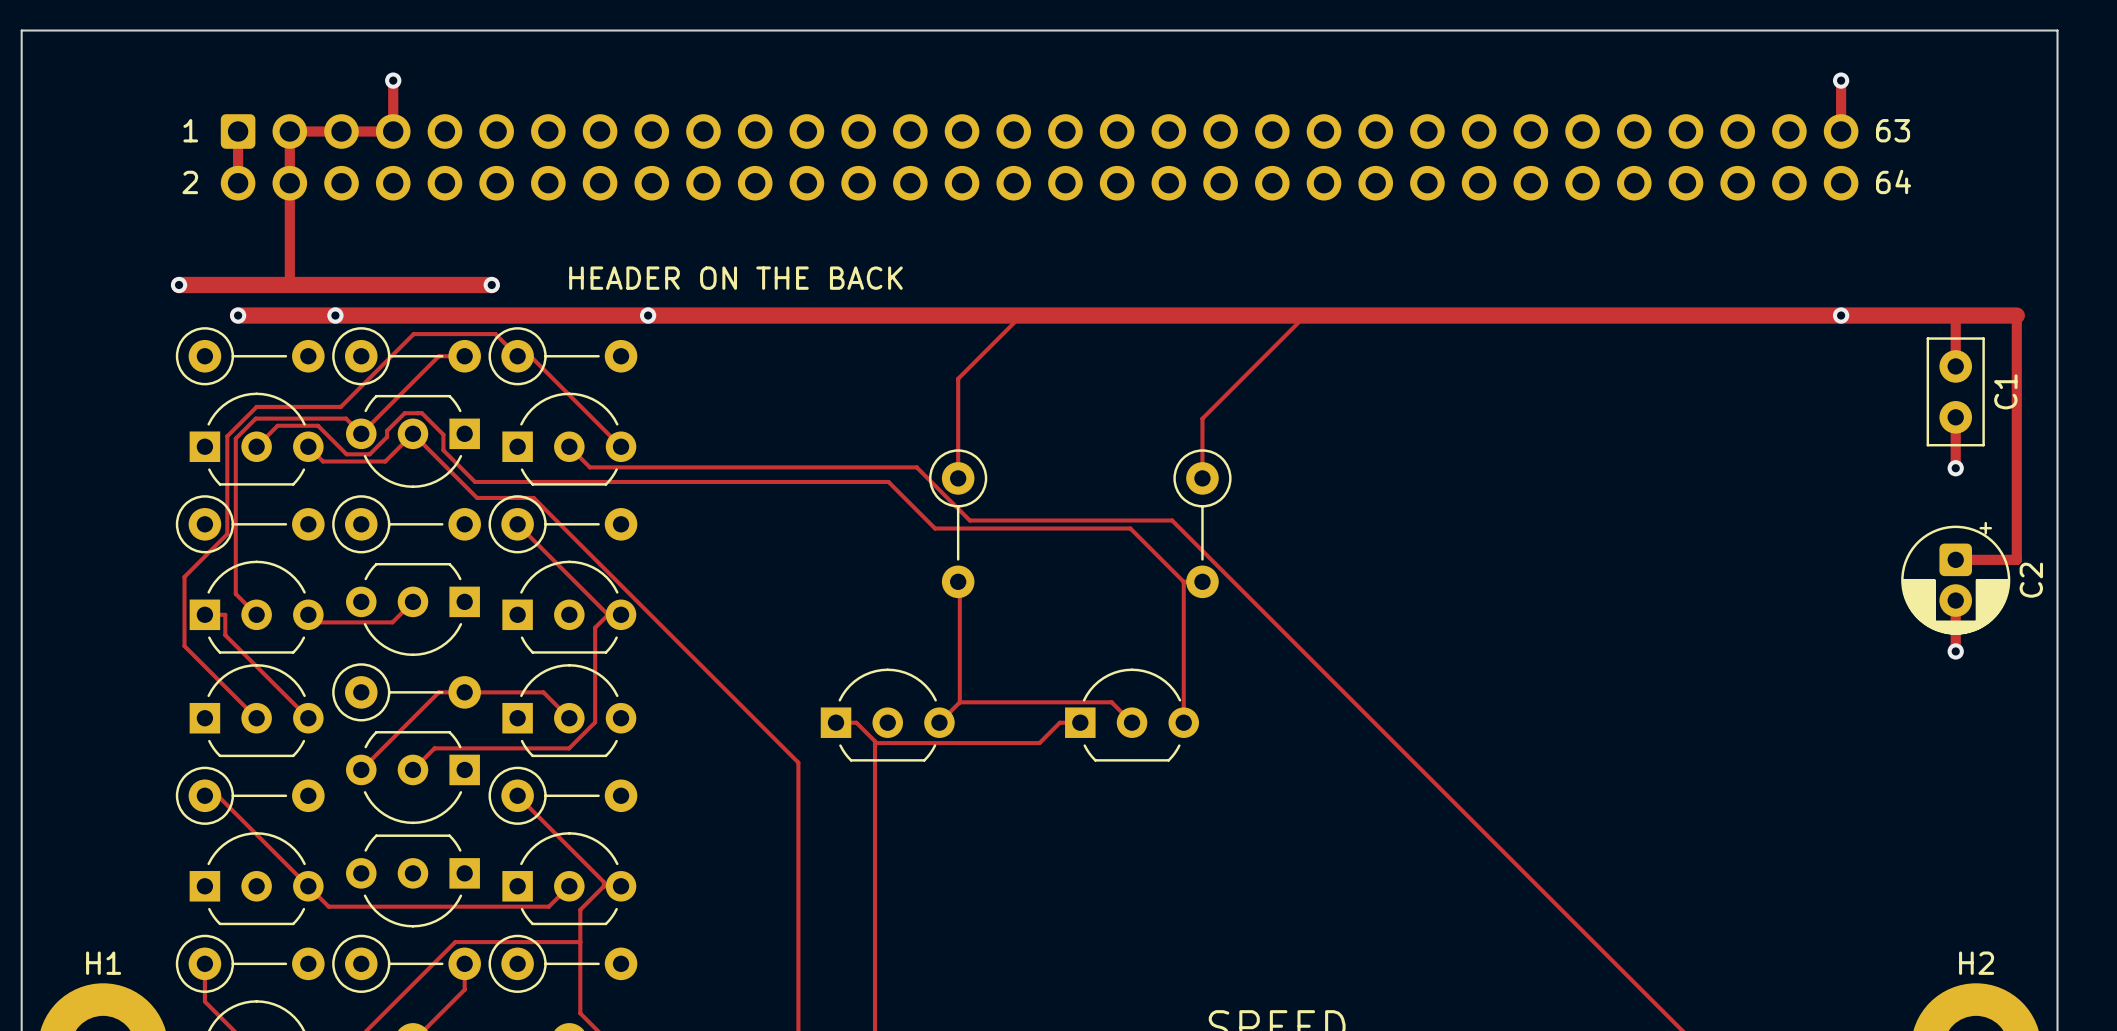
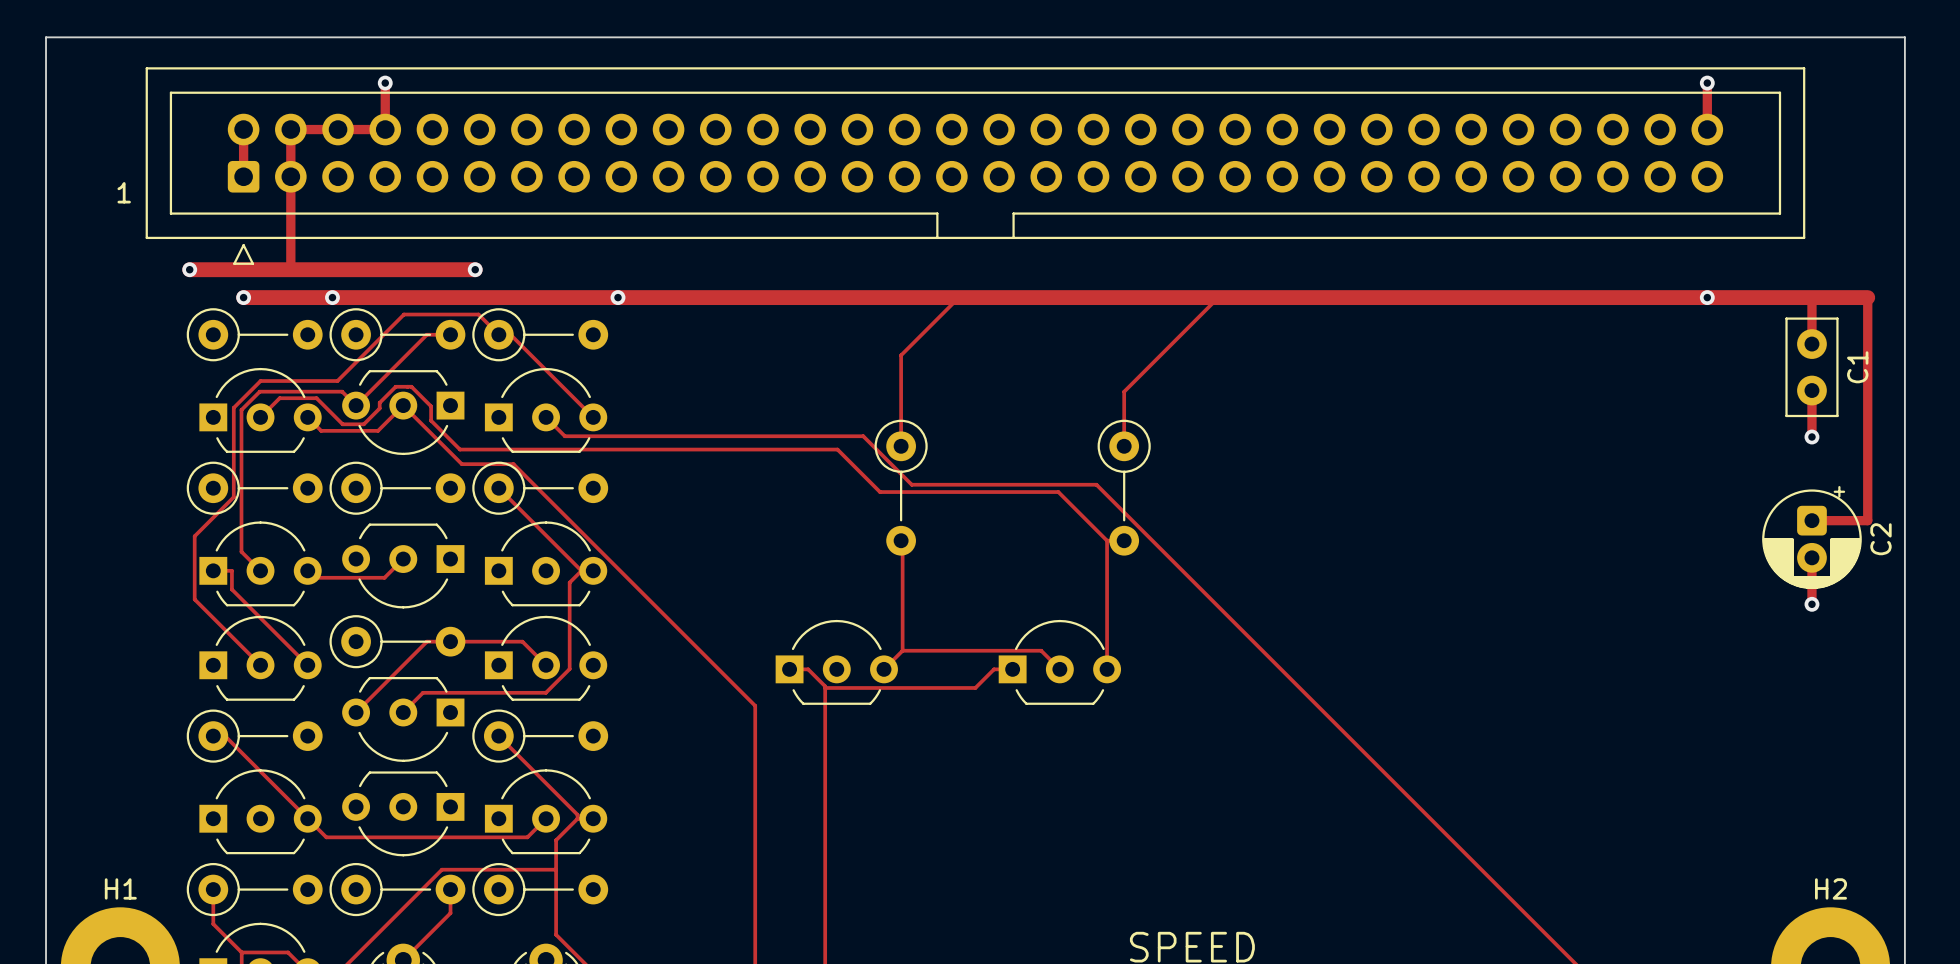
text position: 1 (190, 130) -> 1 (124, 192)
text: 63 (1893, 130) -> none
part side: bottom (1039, 157) -> top (975, 166)
text: 64 (1893, 181) -> none
text: 2 (190, 182) -> none
text: HEADER ON THE BACK (735, 278) -> none

